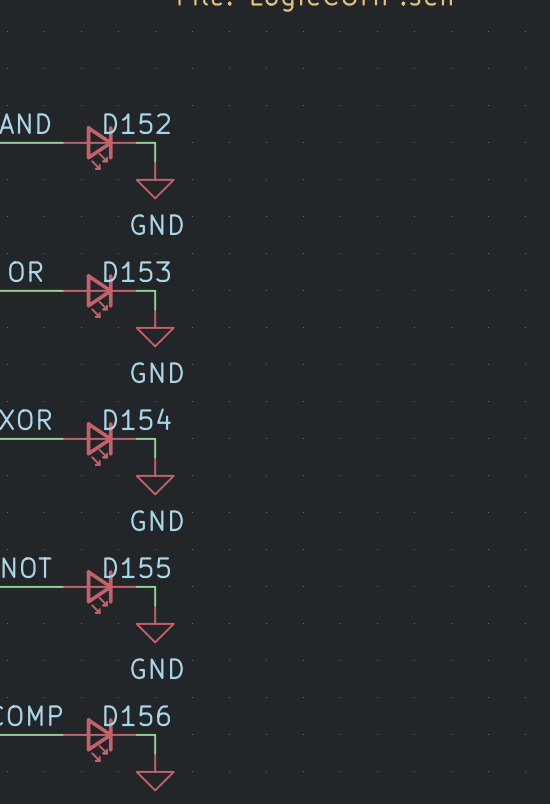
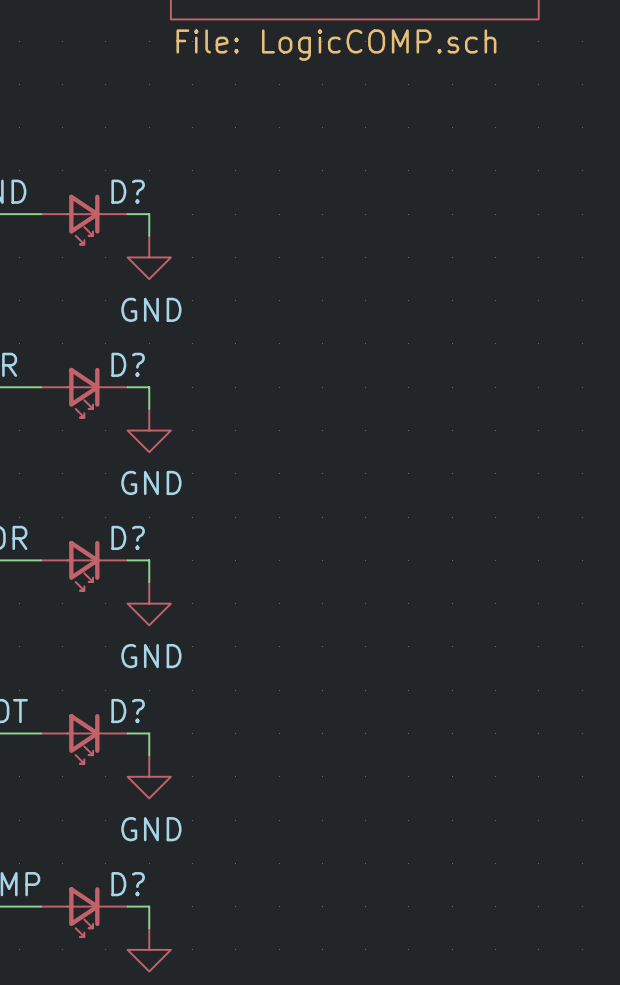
D152 name: D152 (137, 123) -> D? (128, 191)
D153 name: D153 (137, 271) -> D? (128, 364)
D154 name: D154 (137, 419) -> D? (128, 537)
D155 name: D155 (137, 567) -> D? (128, 711)
D156 name: D156 (137, 715) -> D? (128, 884)

